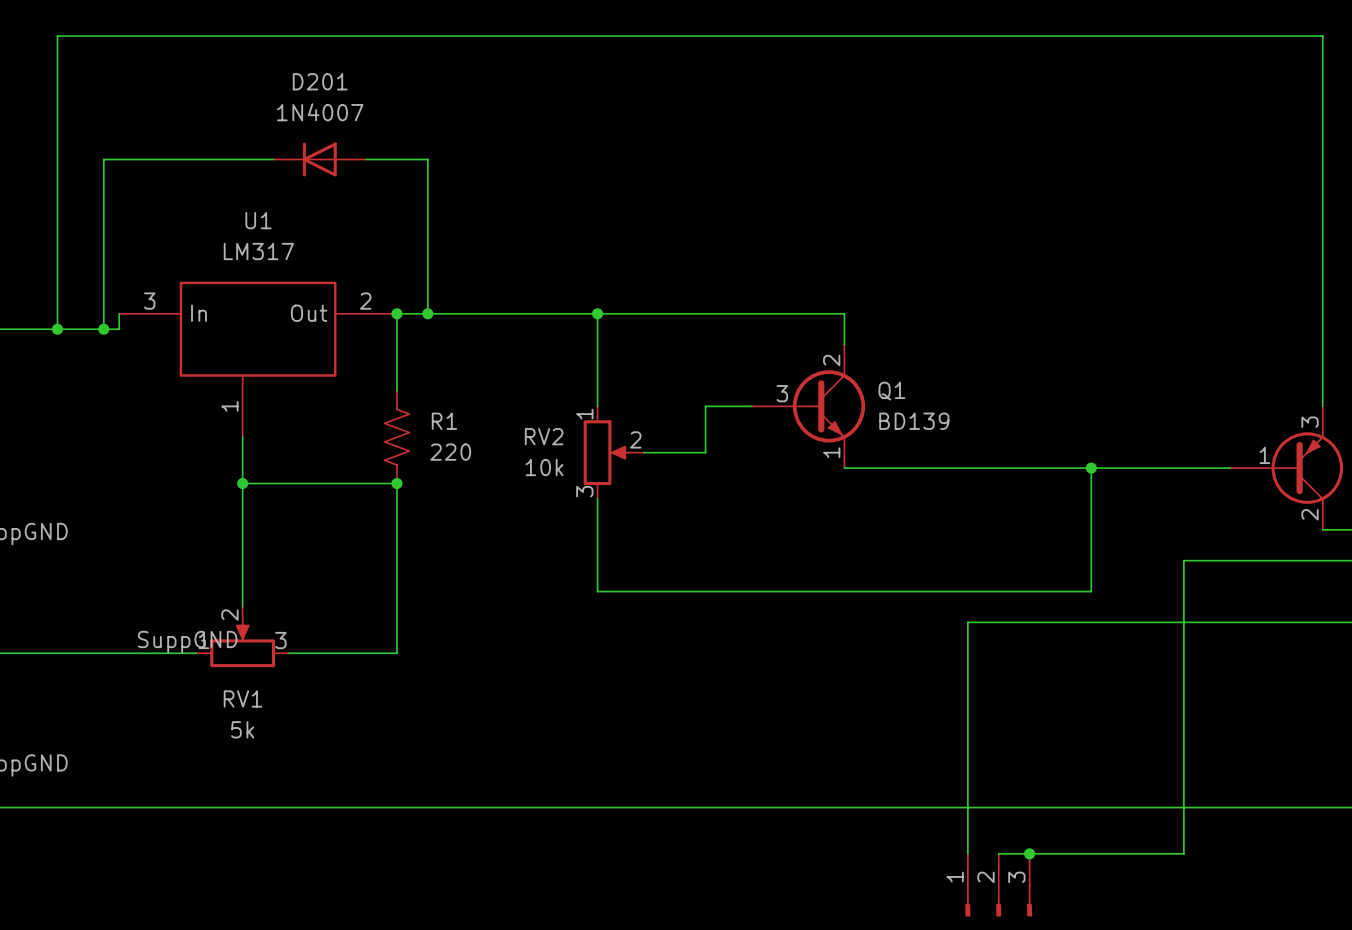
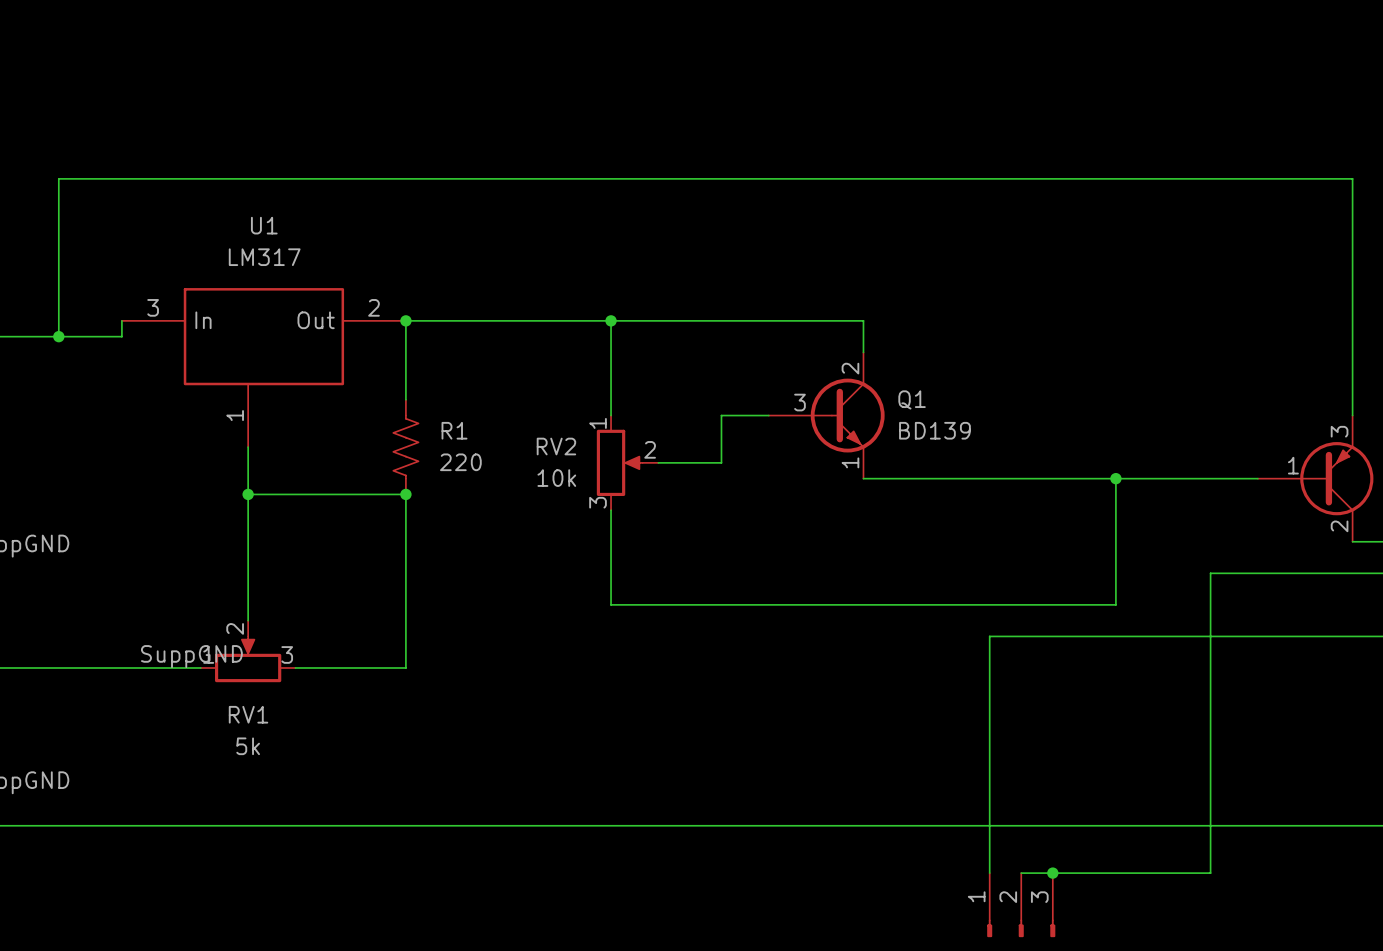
wire: (273, 159) (103, 159) (103, 329) -> none
D201: 1N4007 (319, 159) -> none
wire: (366, 159) (427, 159) (427, 313) -> none
wire: (57, 174) (57, 36) (1322, 36) (1322, 174) -> (58, 178) (1352, 178)
junction: (427, 313) -> none
junction: (103, 329) -> none

